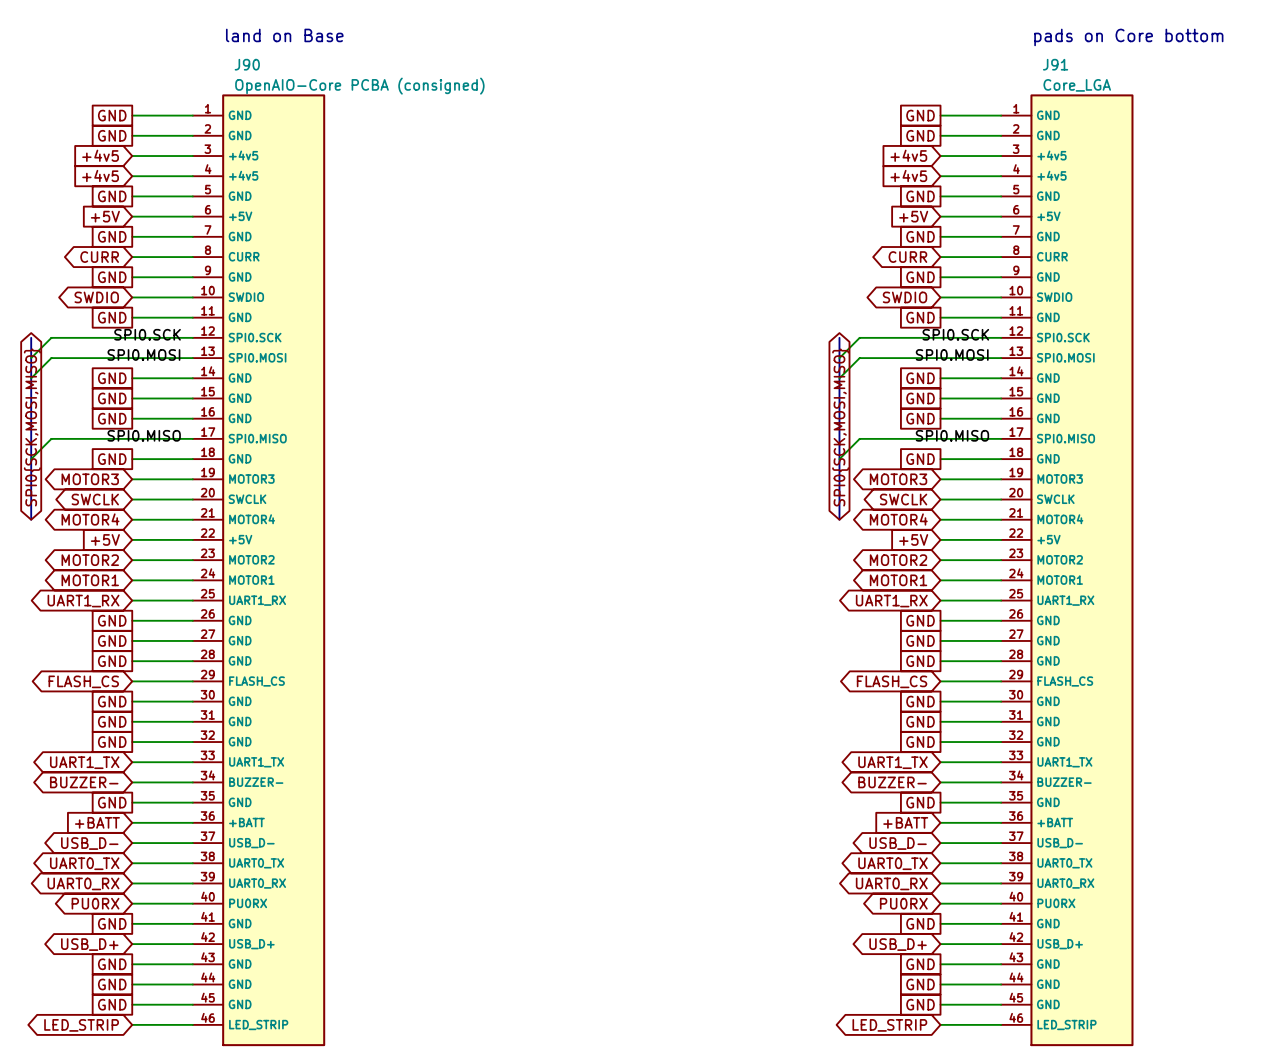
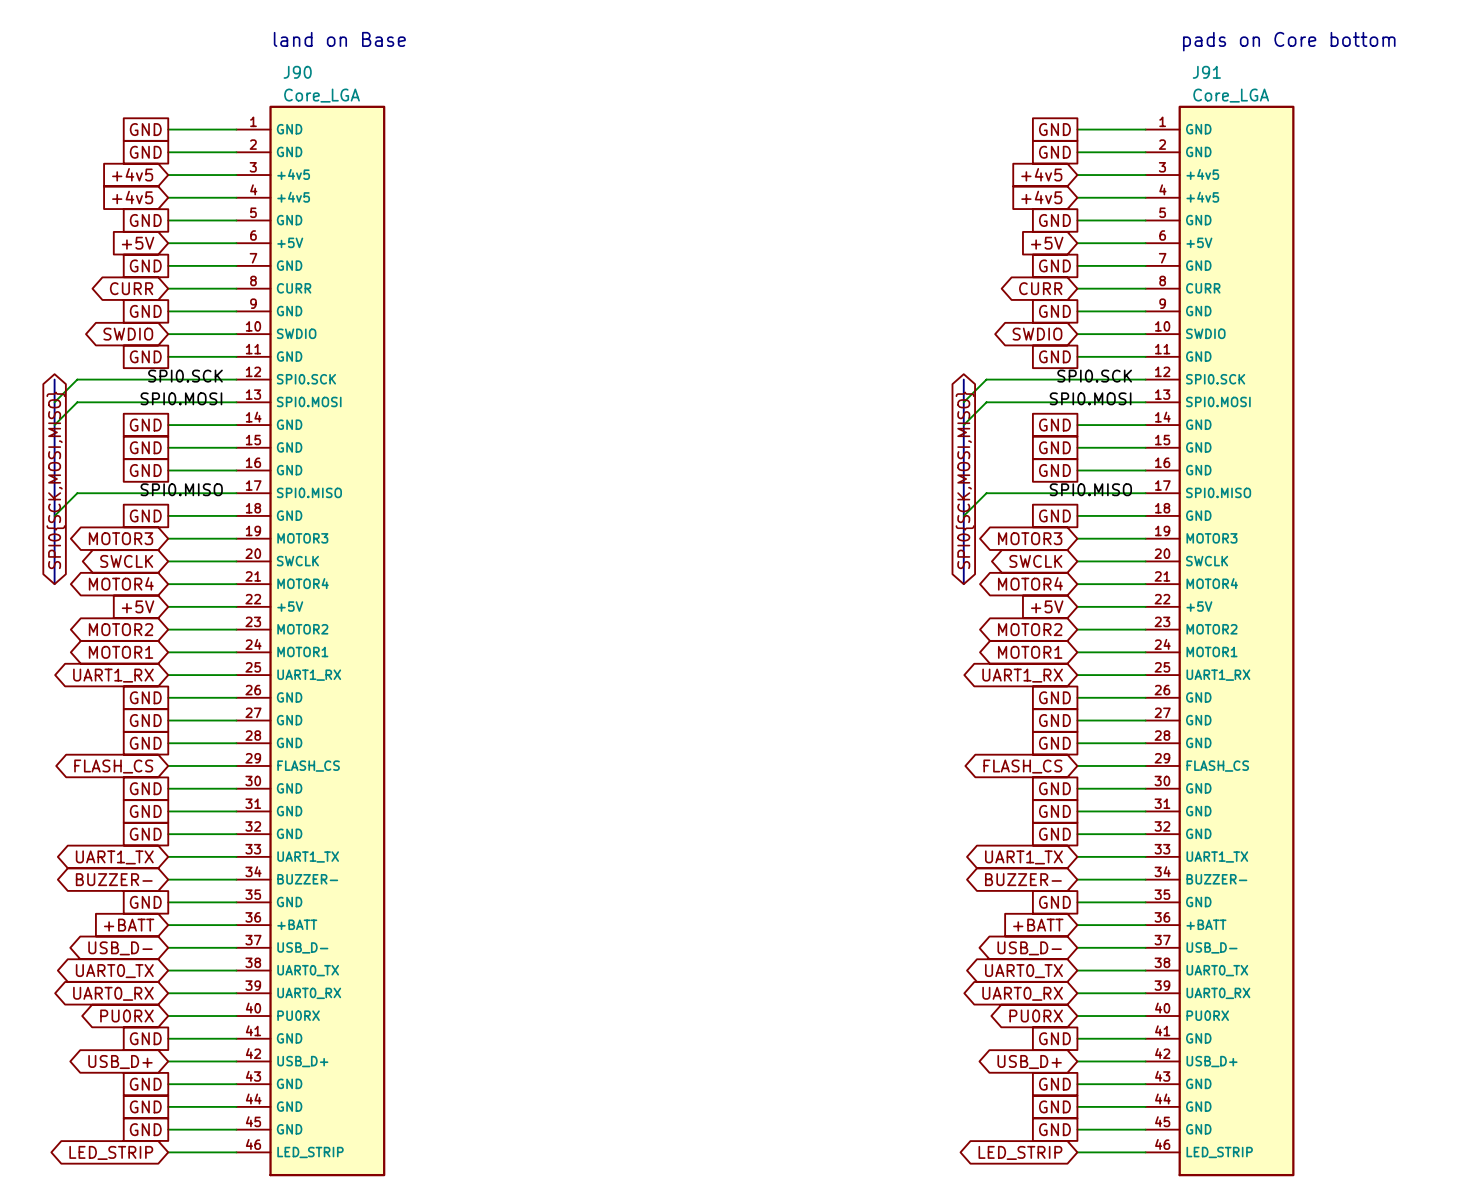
J90 value: OpenAIO-Core PCBA (consigned) (359, 86) -> Core_LGA (322, 95)

